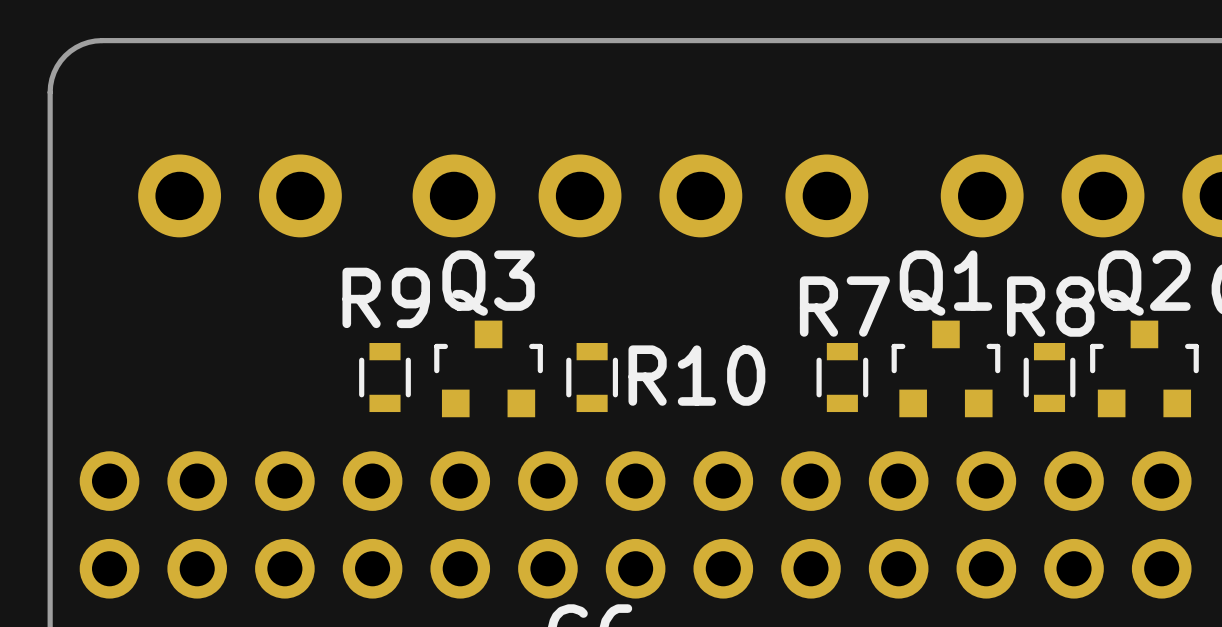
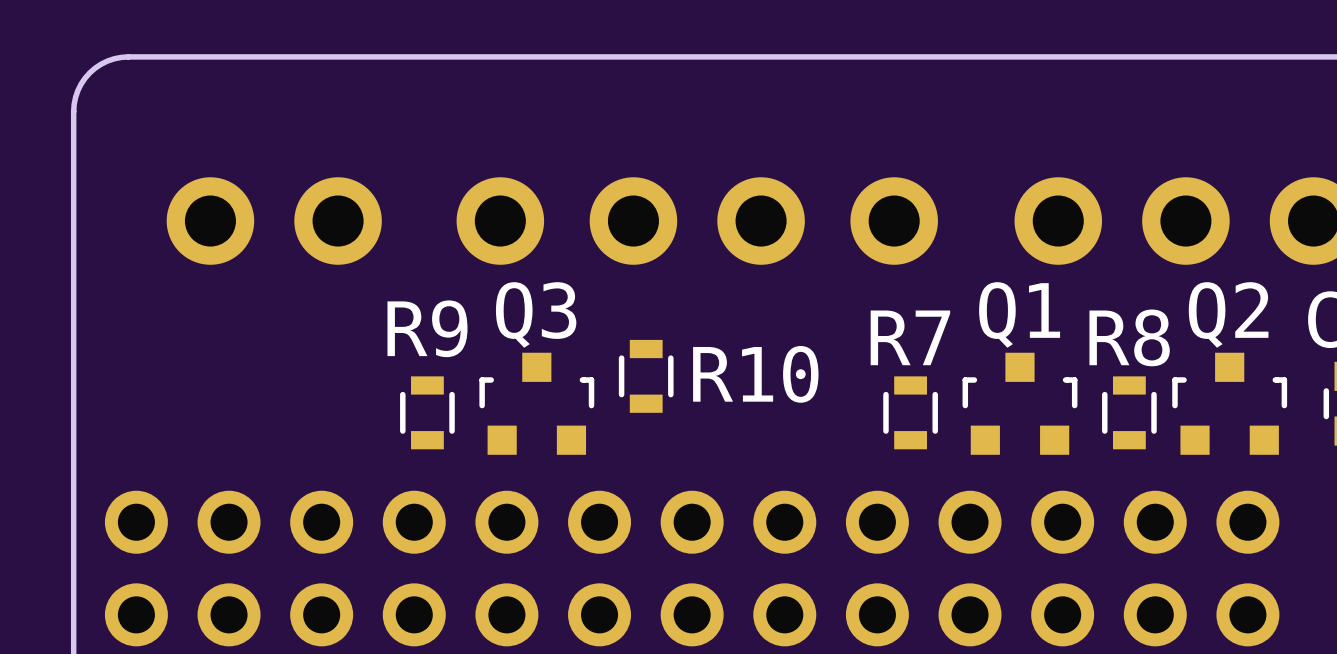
R10 position: (592, 377) -> (646, 376)

